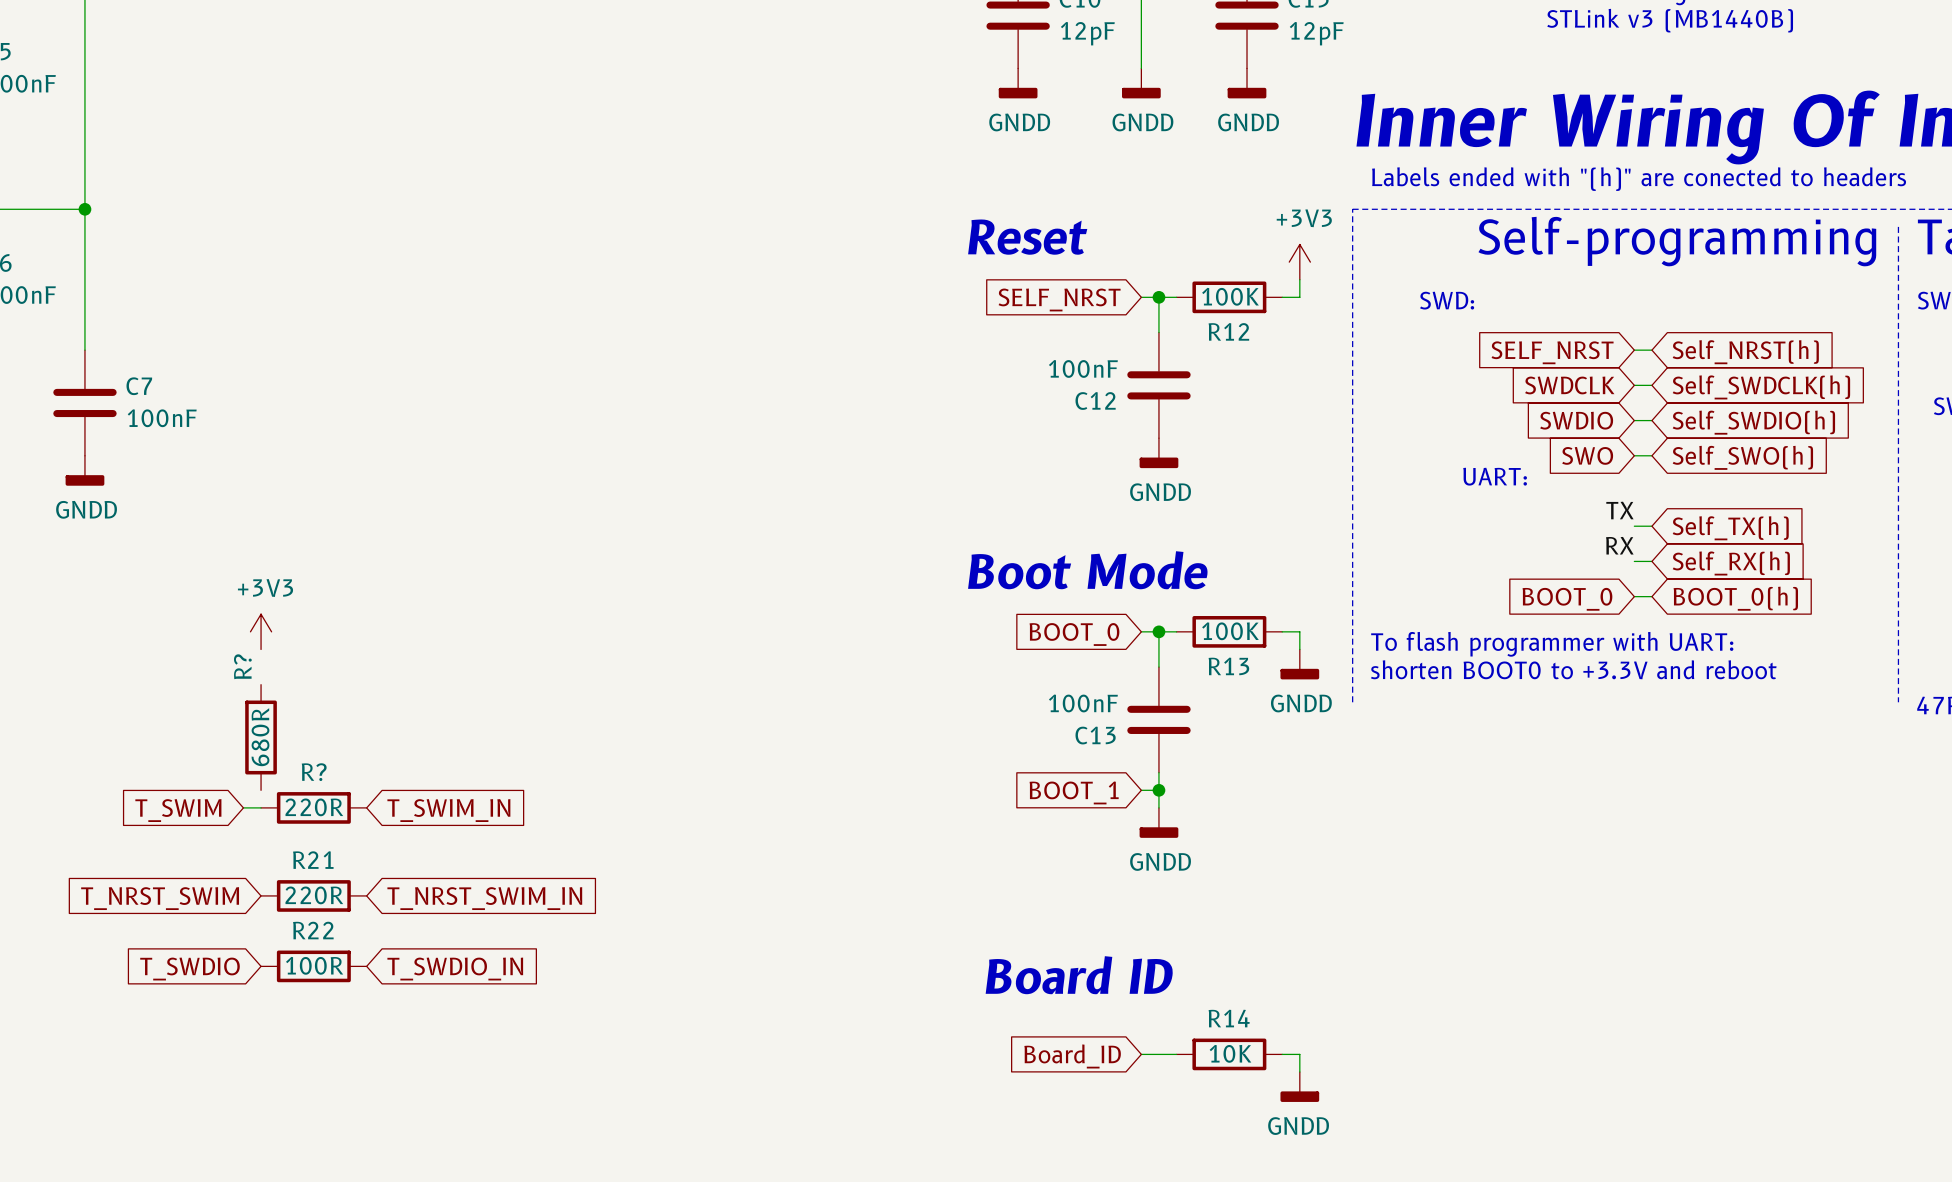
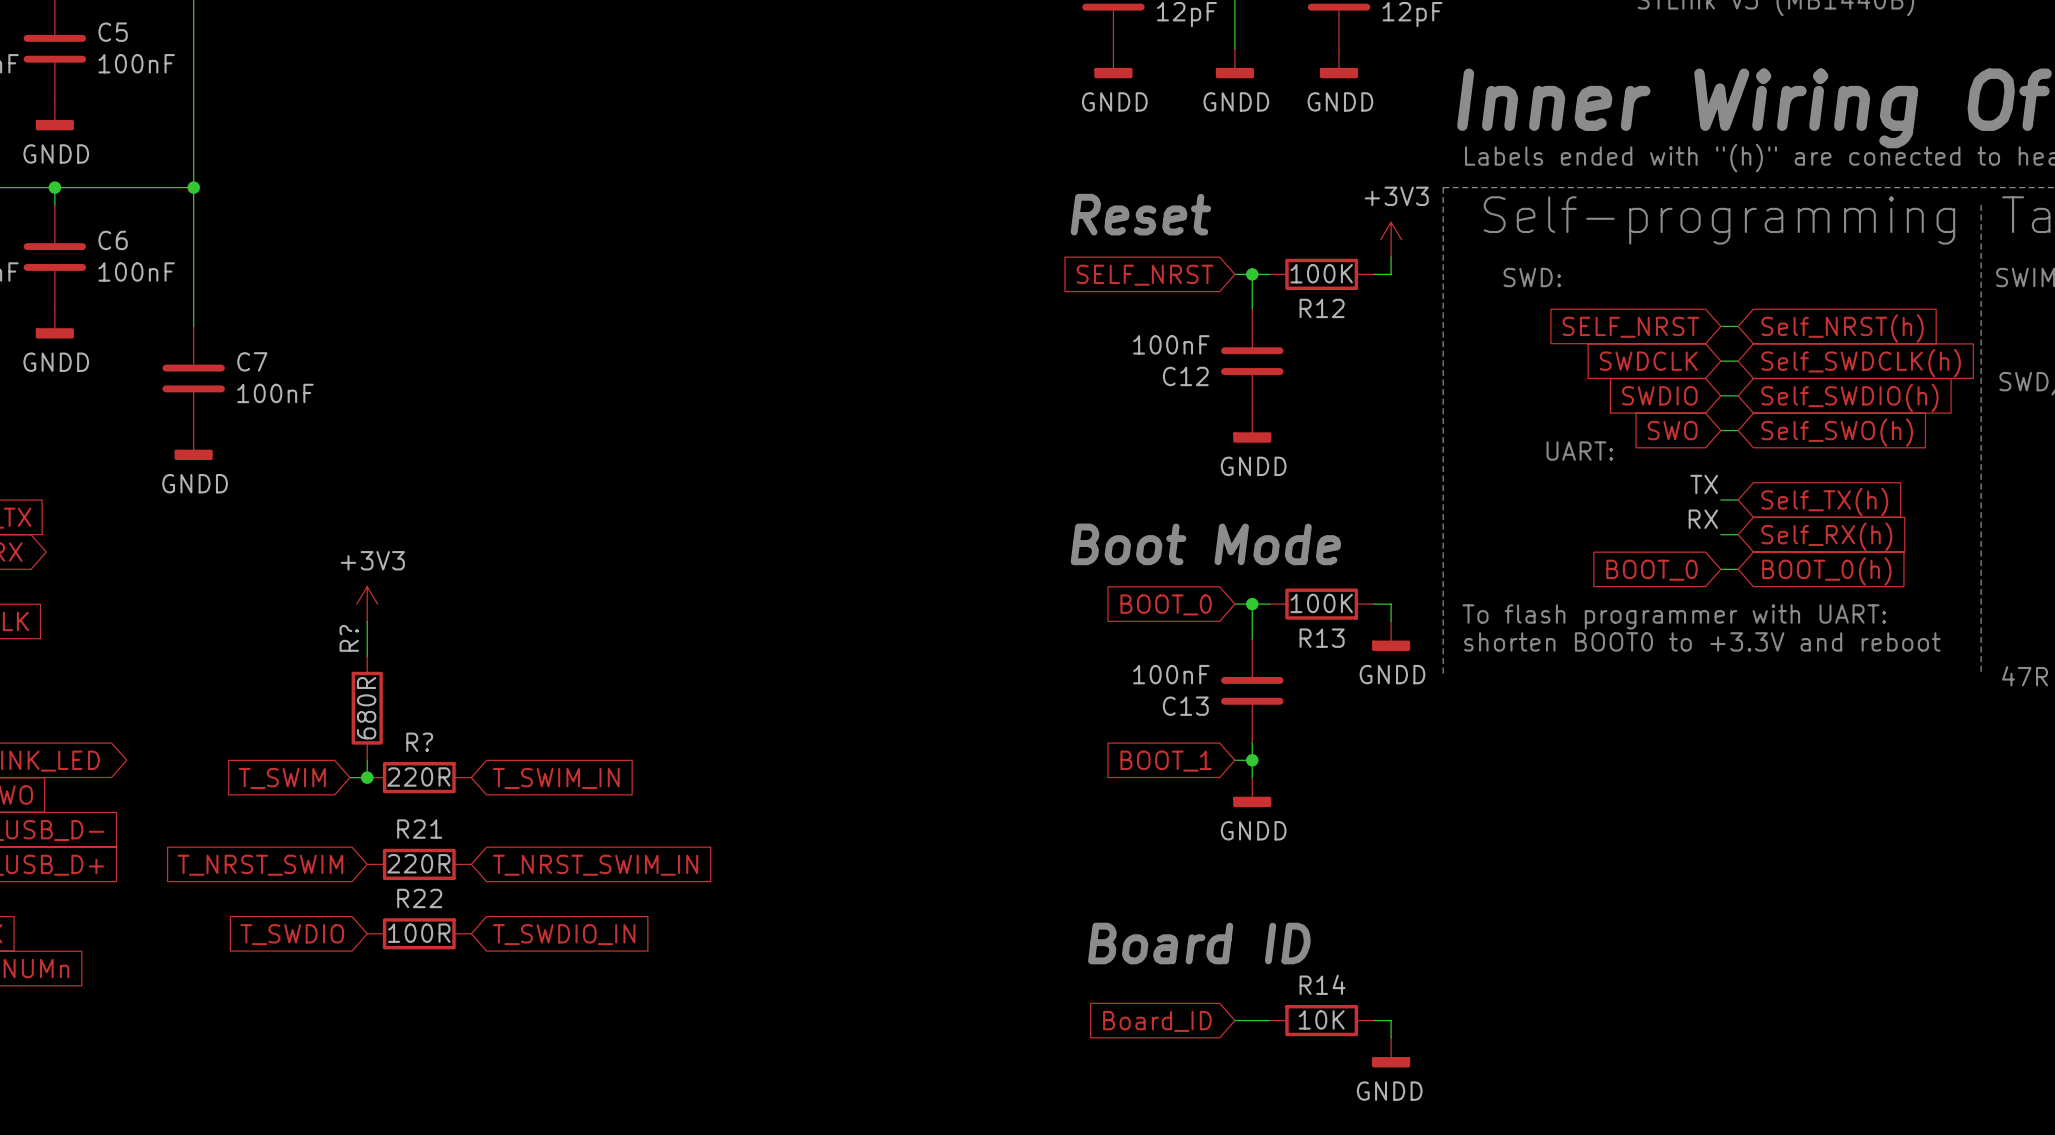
wire: none -> (367, 621) (367, 656)
wire: none -> (367, 760) (367, 777)
junction: none -> (367, 777)

